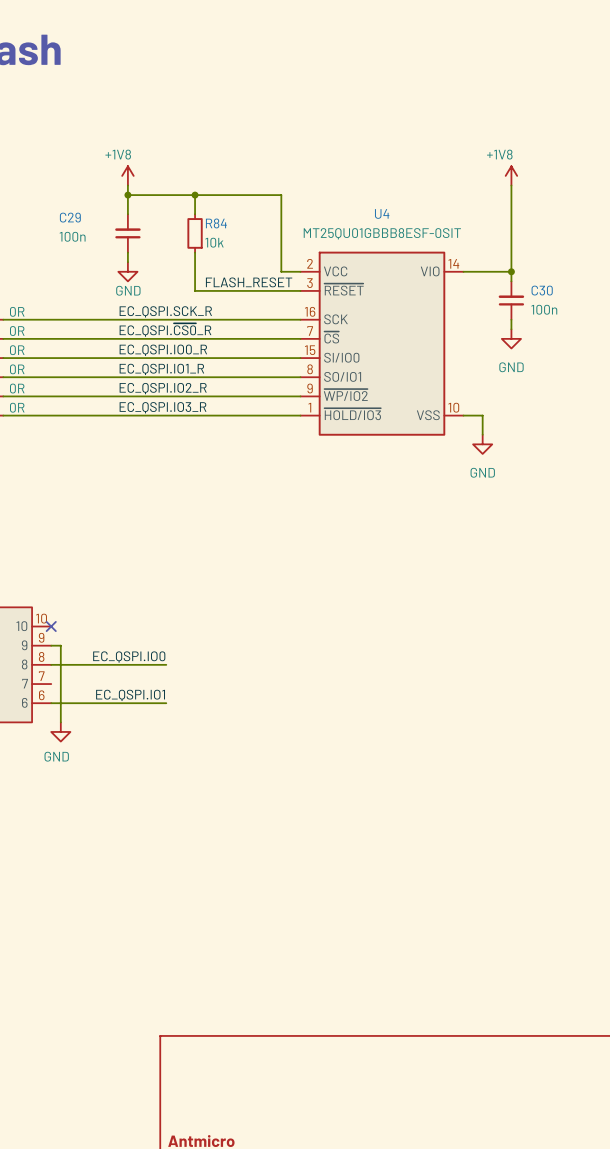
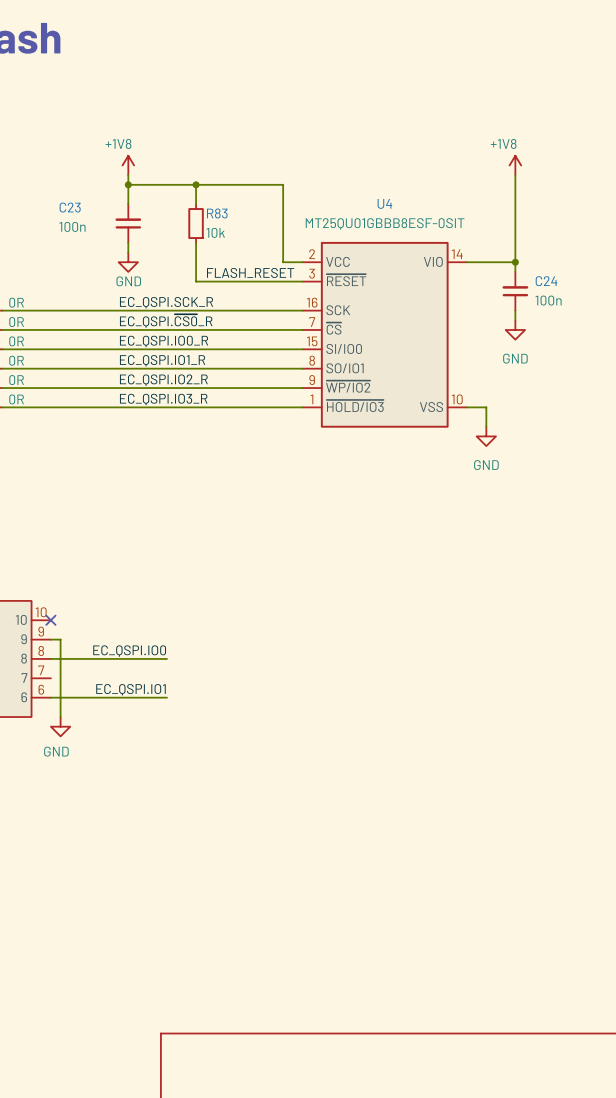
C29 name: C29 (70, 217) -> C23 (70, 207)
R84 name: R84 (216, 223) -> R83 (217, 213)
C30 name: C30 (542, 290) -> C24 (546, 281)

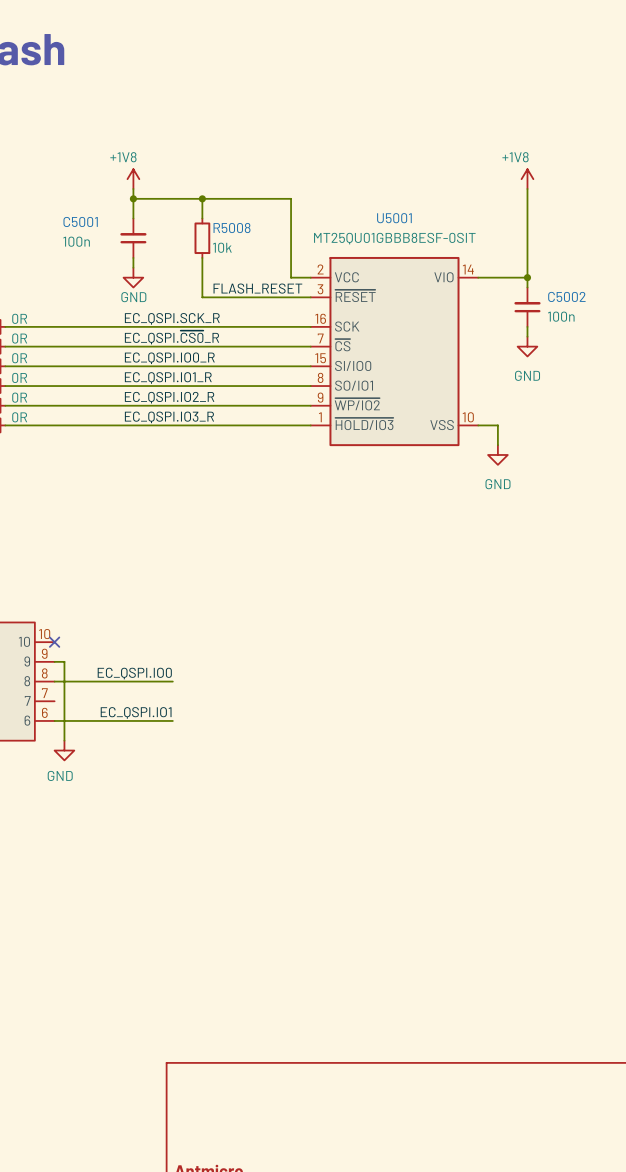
U4 name: U4 (384, 203) -> U5001 (394, 218)
C23 name: C23 (70, 207) -> C5001 (80, 221)
R83 name: R83 (217, 213) -> R5008 (232, 228)
C24 name: C24 (546, 281) -> C5002 (566, 296)

